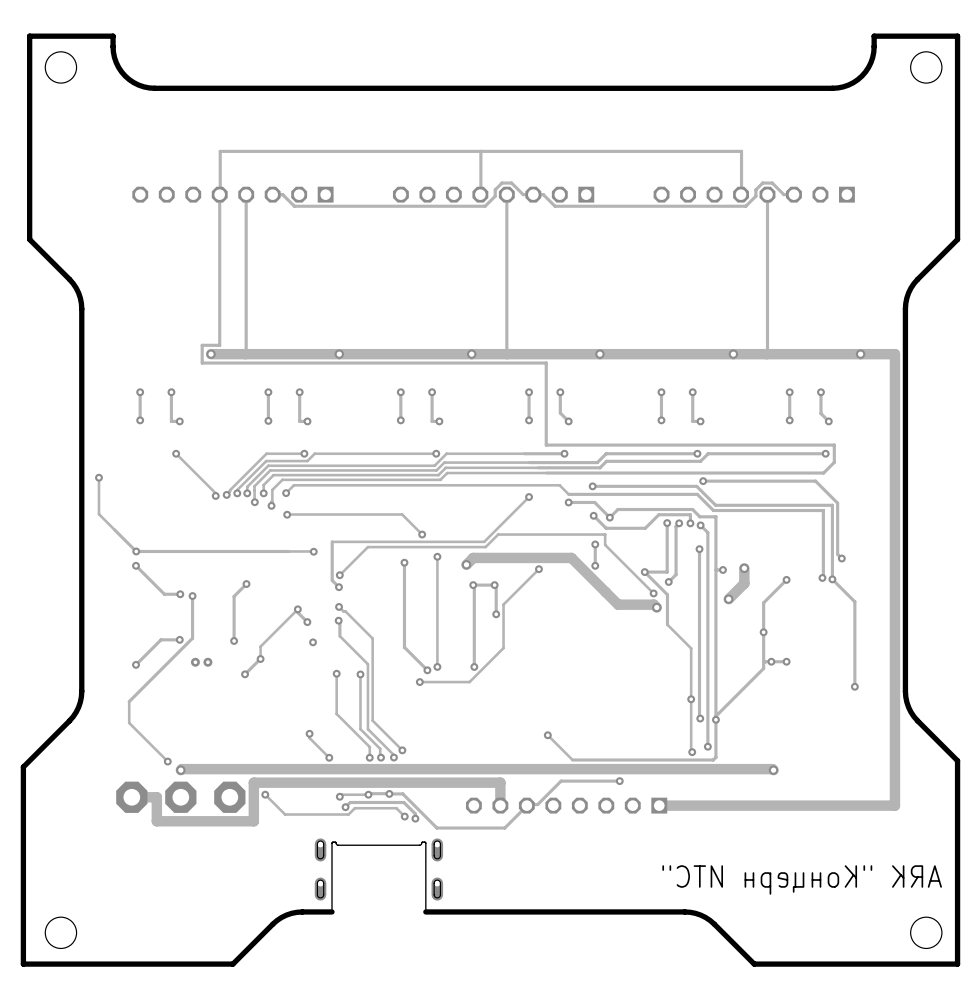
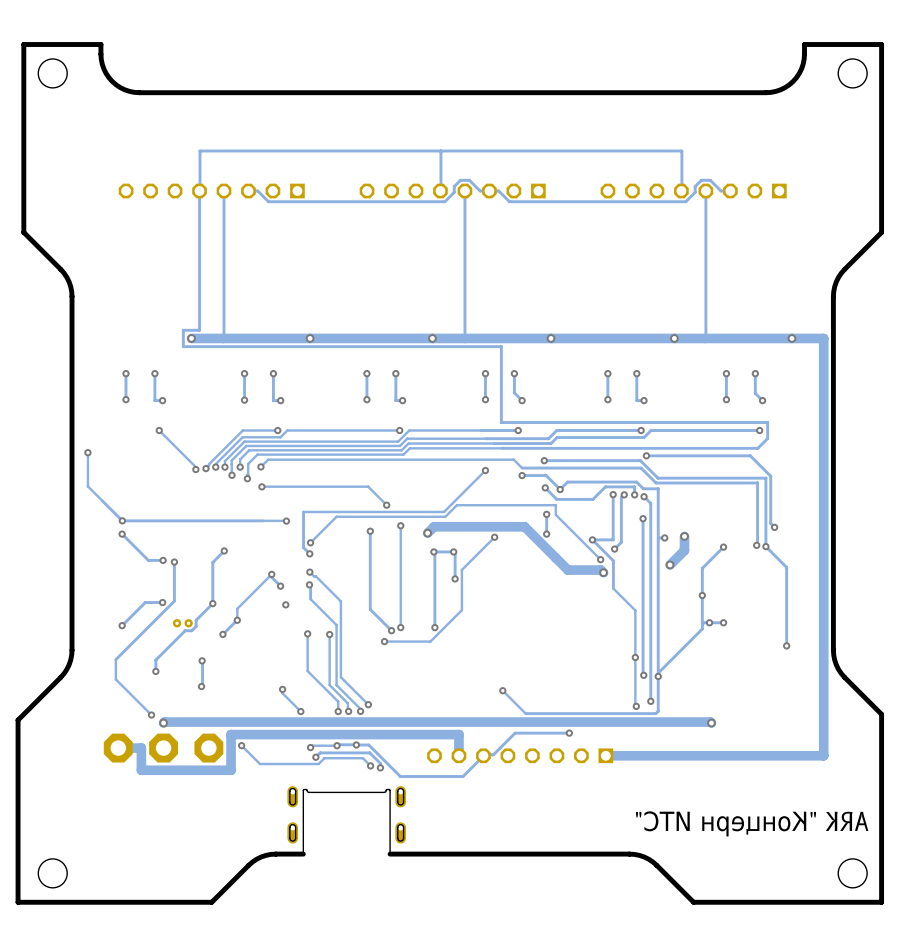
track: none -> (212, 603) (196, 620) (196, 626) (191, 630) (185, 630) (155, 660) (155, 671)
track: none -> (202, 660) (201, 686)
via: none -> (202, 660)
via: none -> (155, 671)
via: none -> (201, 686)

